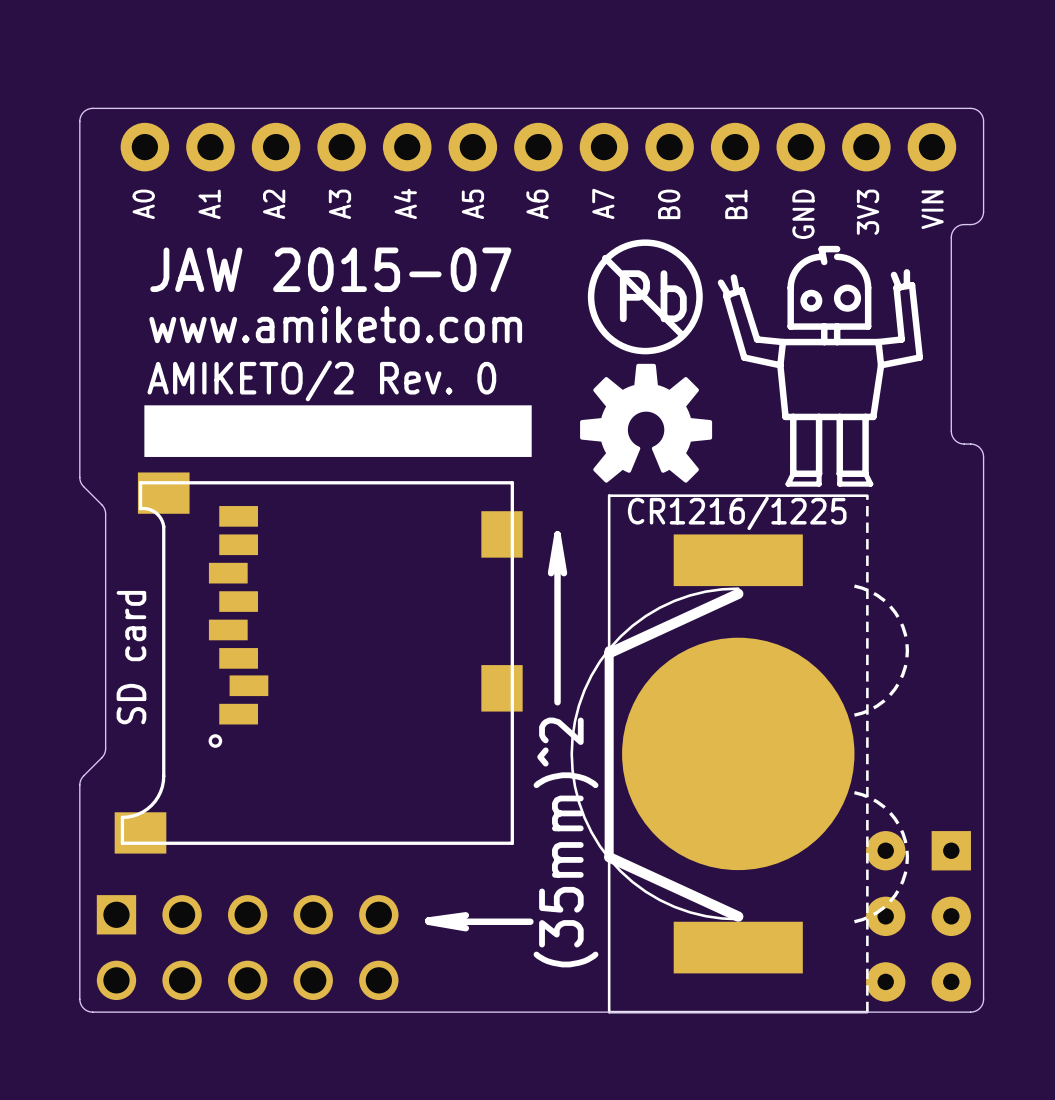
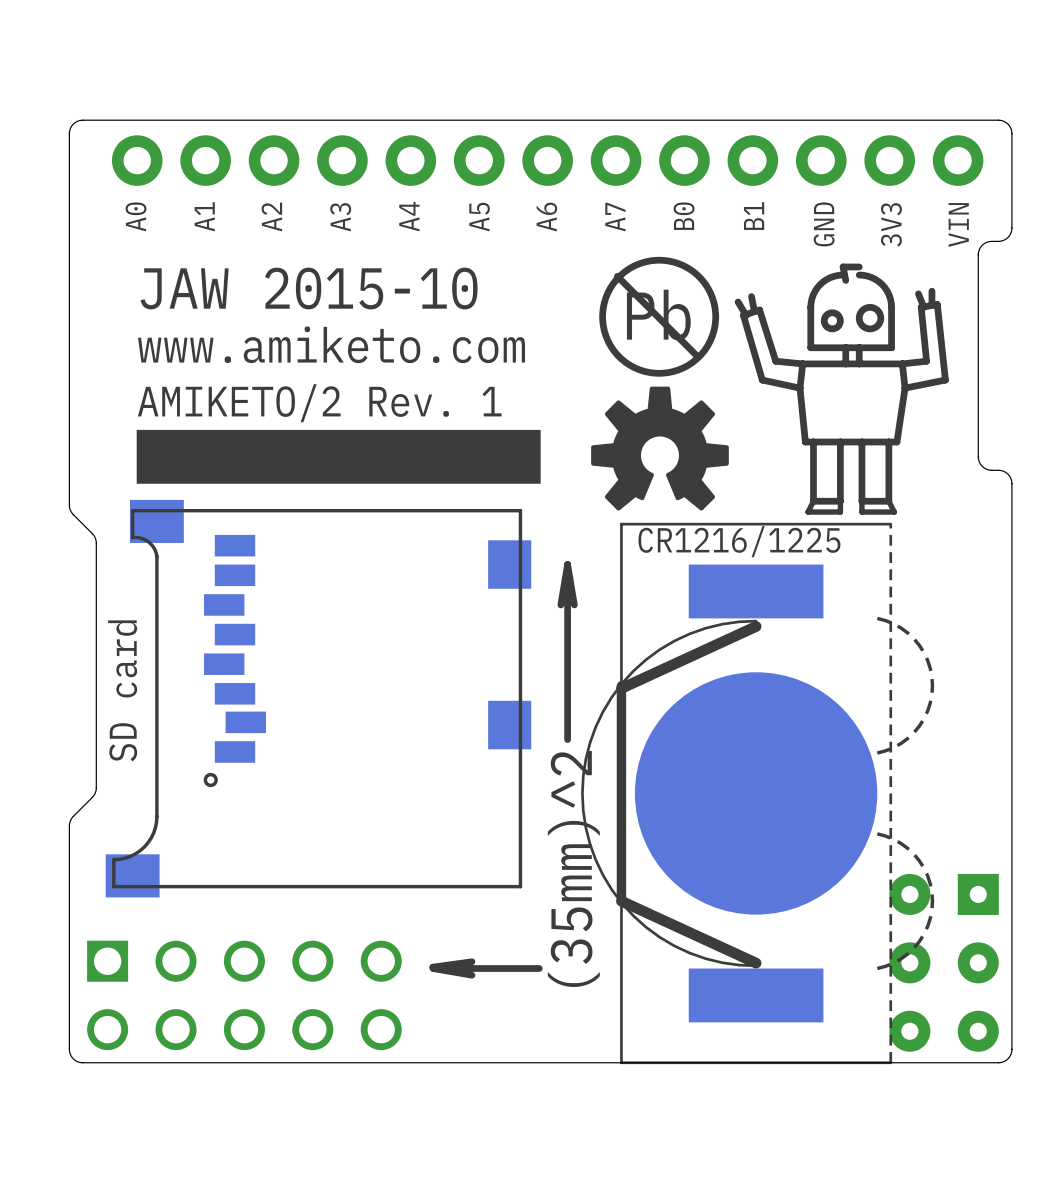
text: JAW 2015-07 (330, 269) -> JAW 2015-10 (309, 288)
text: AMIKETO/2 Rev. 0 (321, 380) -> AMIKETO/2 Rev. 1 (319, 403)

